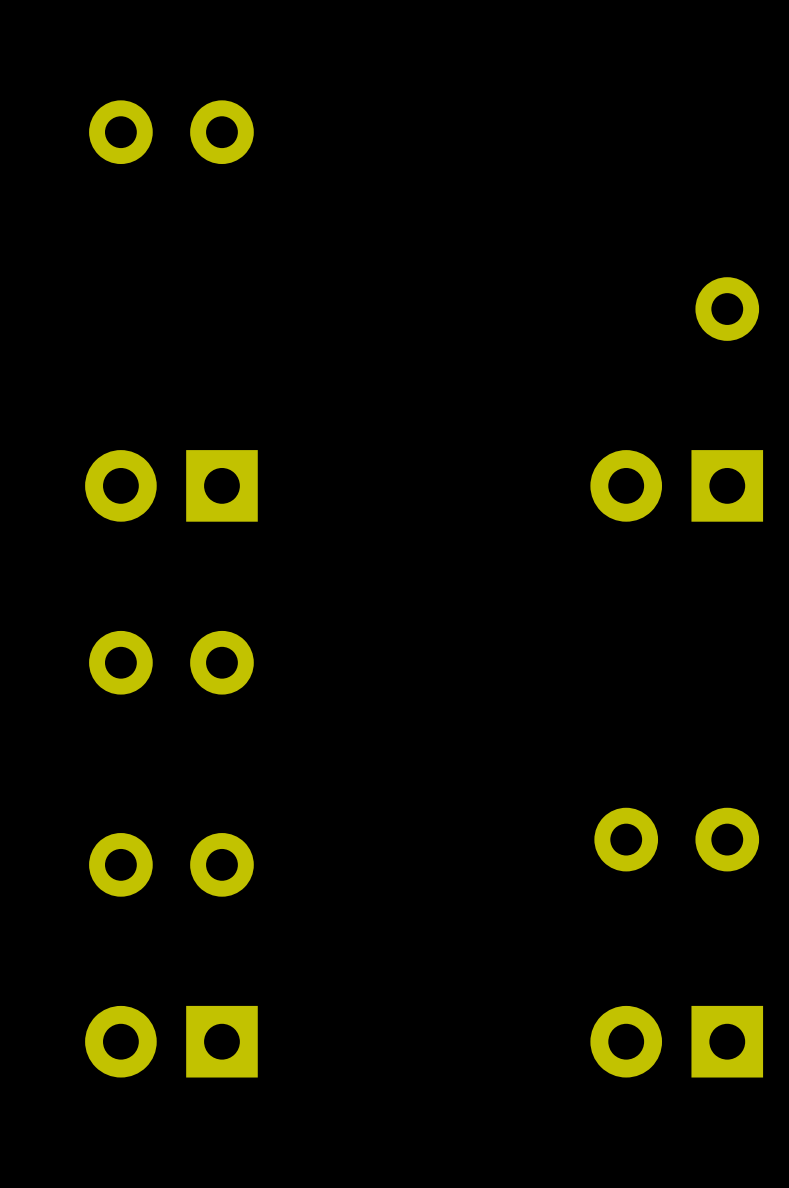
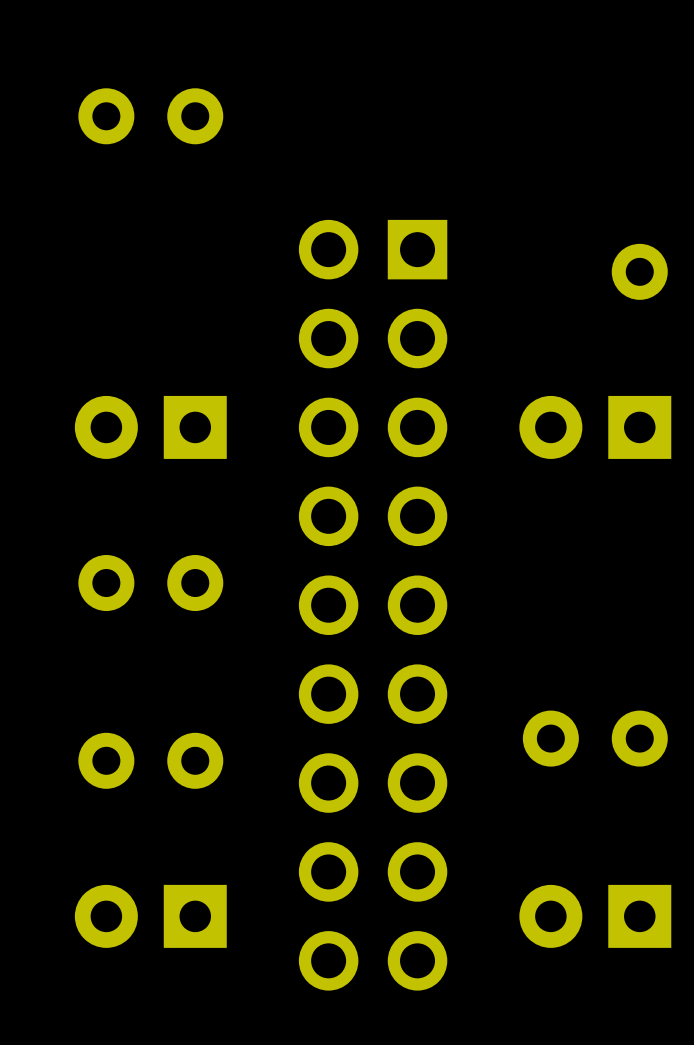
part: none -> (373, 605)

